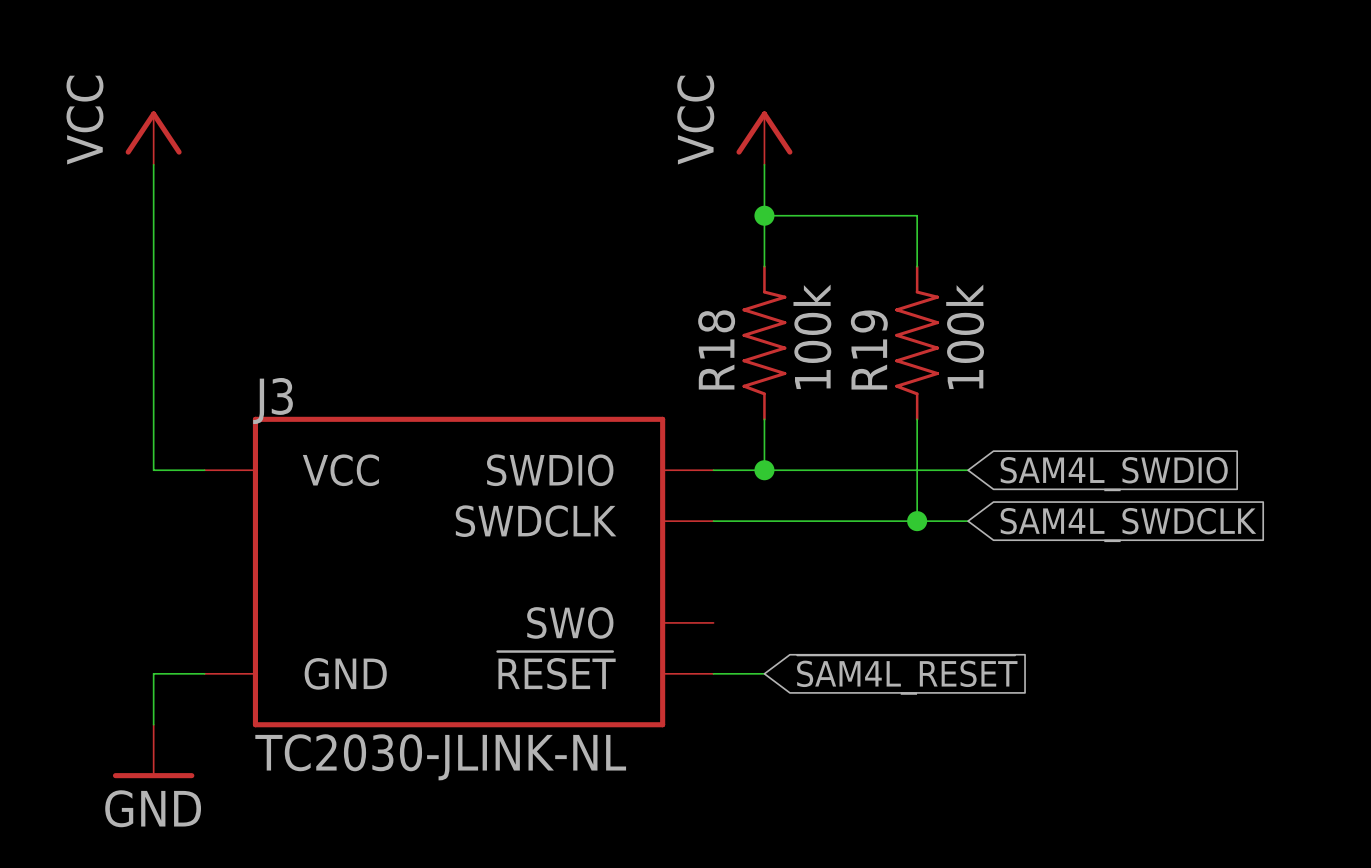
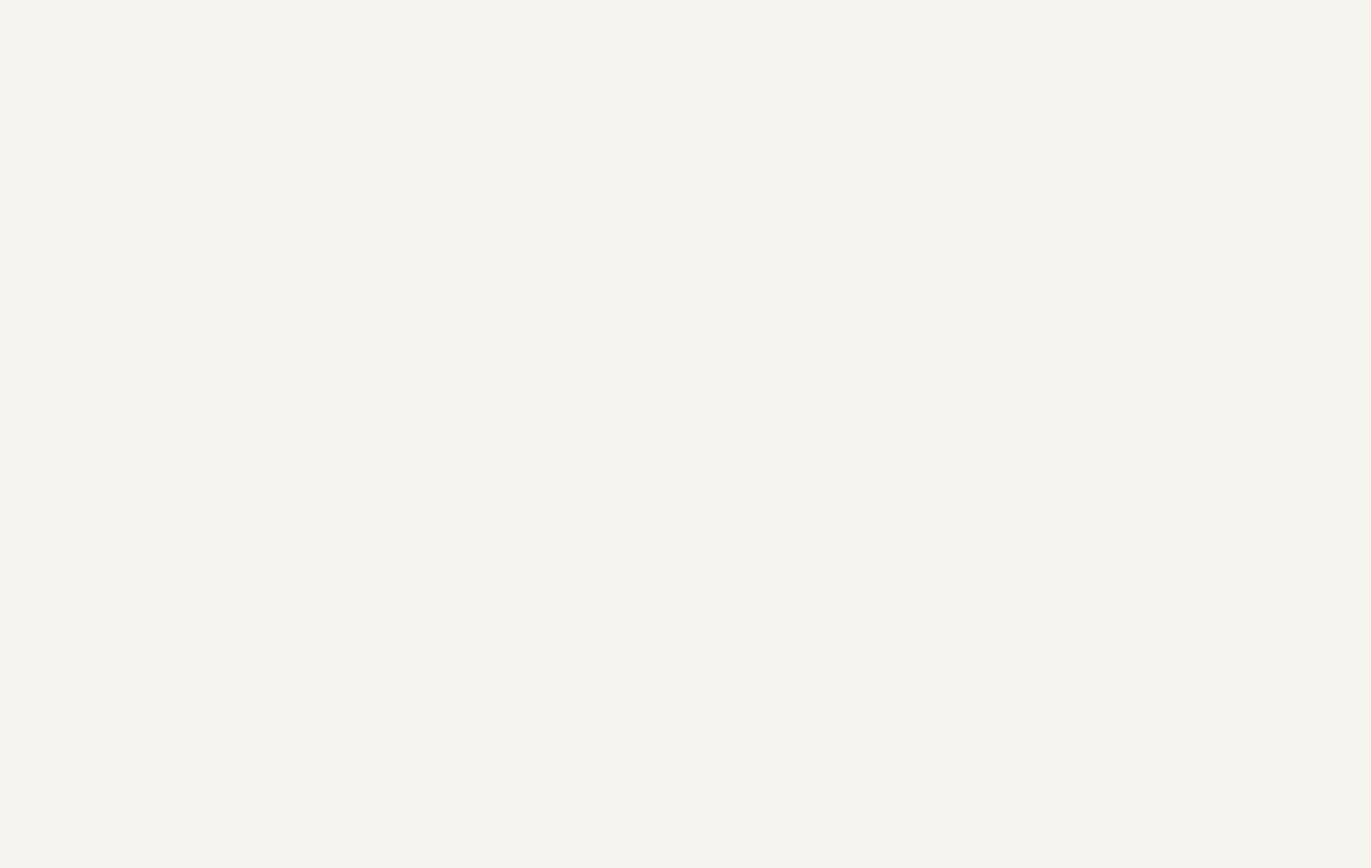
power symbol: VCC (153, 138) -> none
power symbol: VCC (764, 138) -> none
wire: (153, 164) (153, 470) (204, 470) -> none
wire: (764, 164) (764, 266) -> none
wire: (764, 215) (917, 215) (917, 266) -> none
junction: (764, 215) -> none
R18: 100k (764, 342) -> none
R19: 100k (917, 342) -> none
wire: (764, 419) (764, 470) -> none
wire: (917, 419) (917, 521) -> none
wire: (713, 470) (968, 470) -> none
junction: (764, 470) -> none
global label: SAM4L_SWDIO (1114, 474) -> none
wire: (713, 521) (968, 521) -> none
junction: (917, 521) -> none
global label: SAM4L_SWDCLK (1128, 525) -> none
J3: TC2030-JLINK-NL (459, 572) -> none
wire: (204, 673) (153, 673) (153, 724) -> none
wire: (713, 673) (764, 673) -> none
global label: ~{SAM4L_RESET} (907, 675) -> none
power symbol: GND (153, 751) -> none

